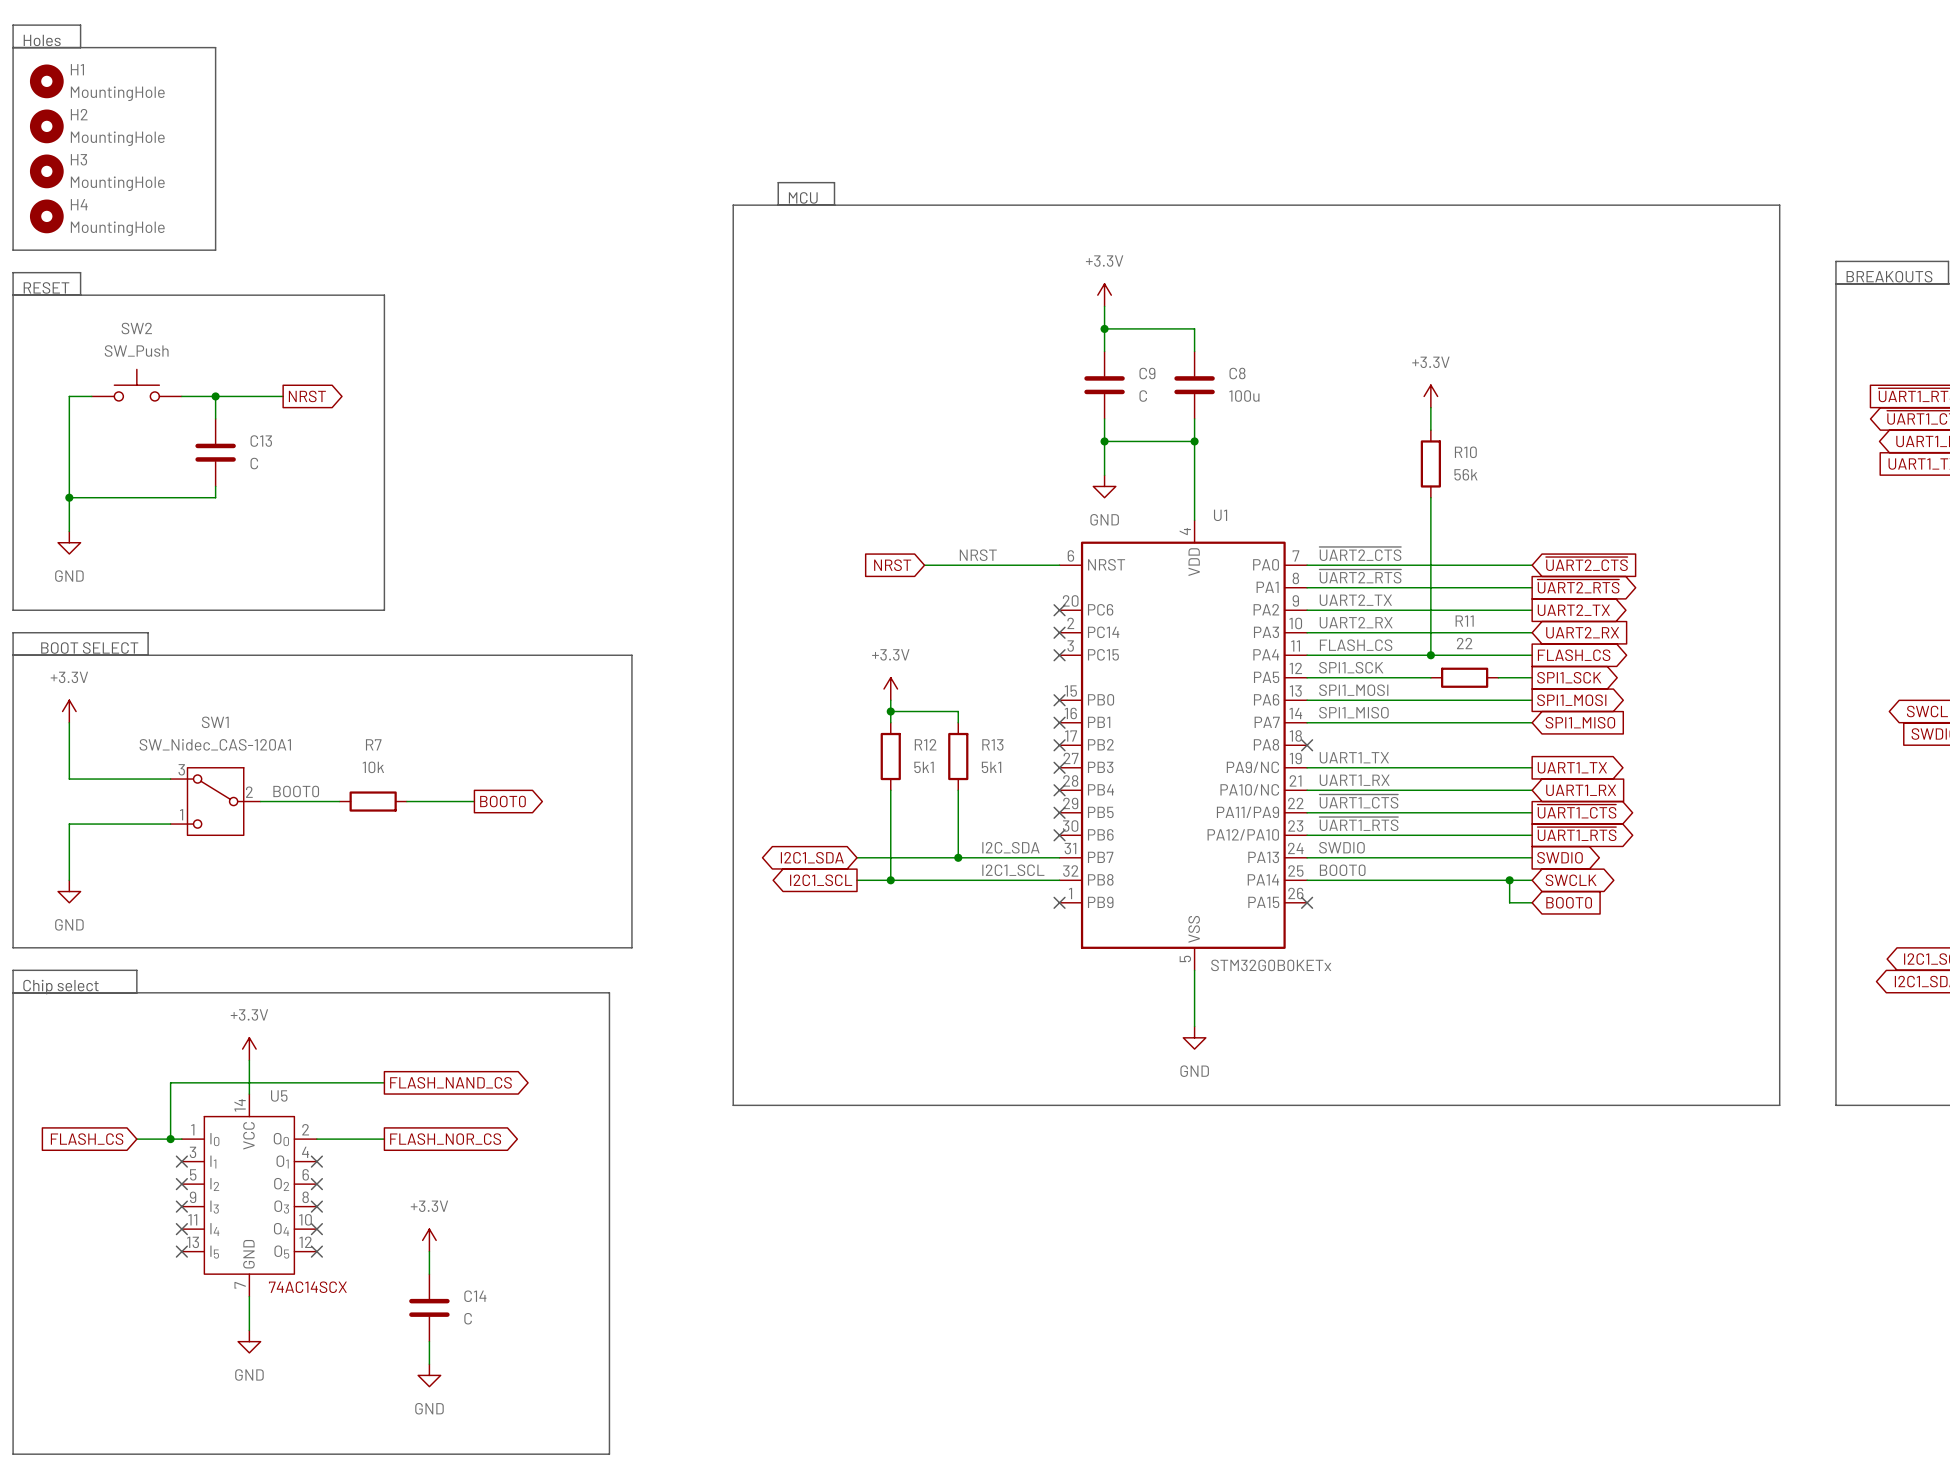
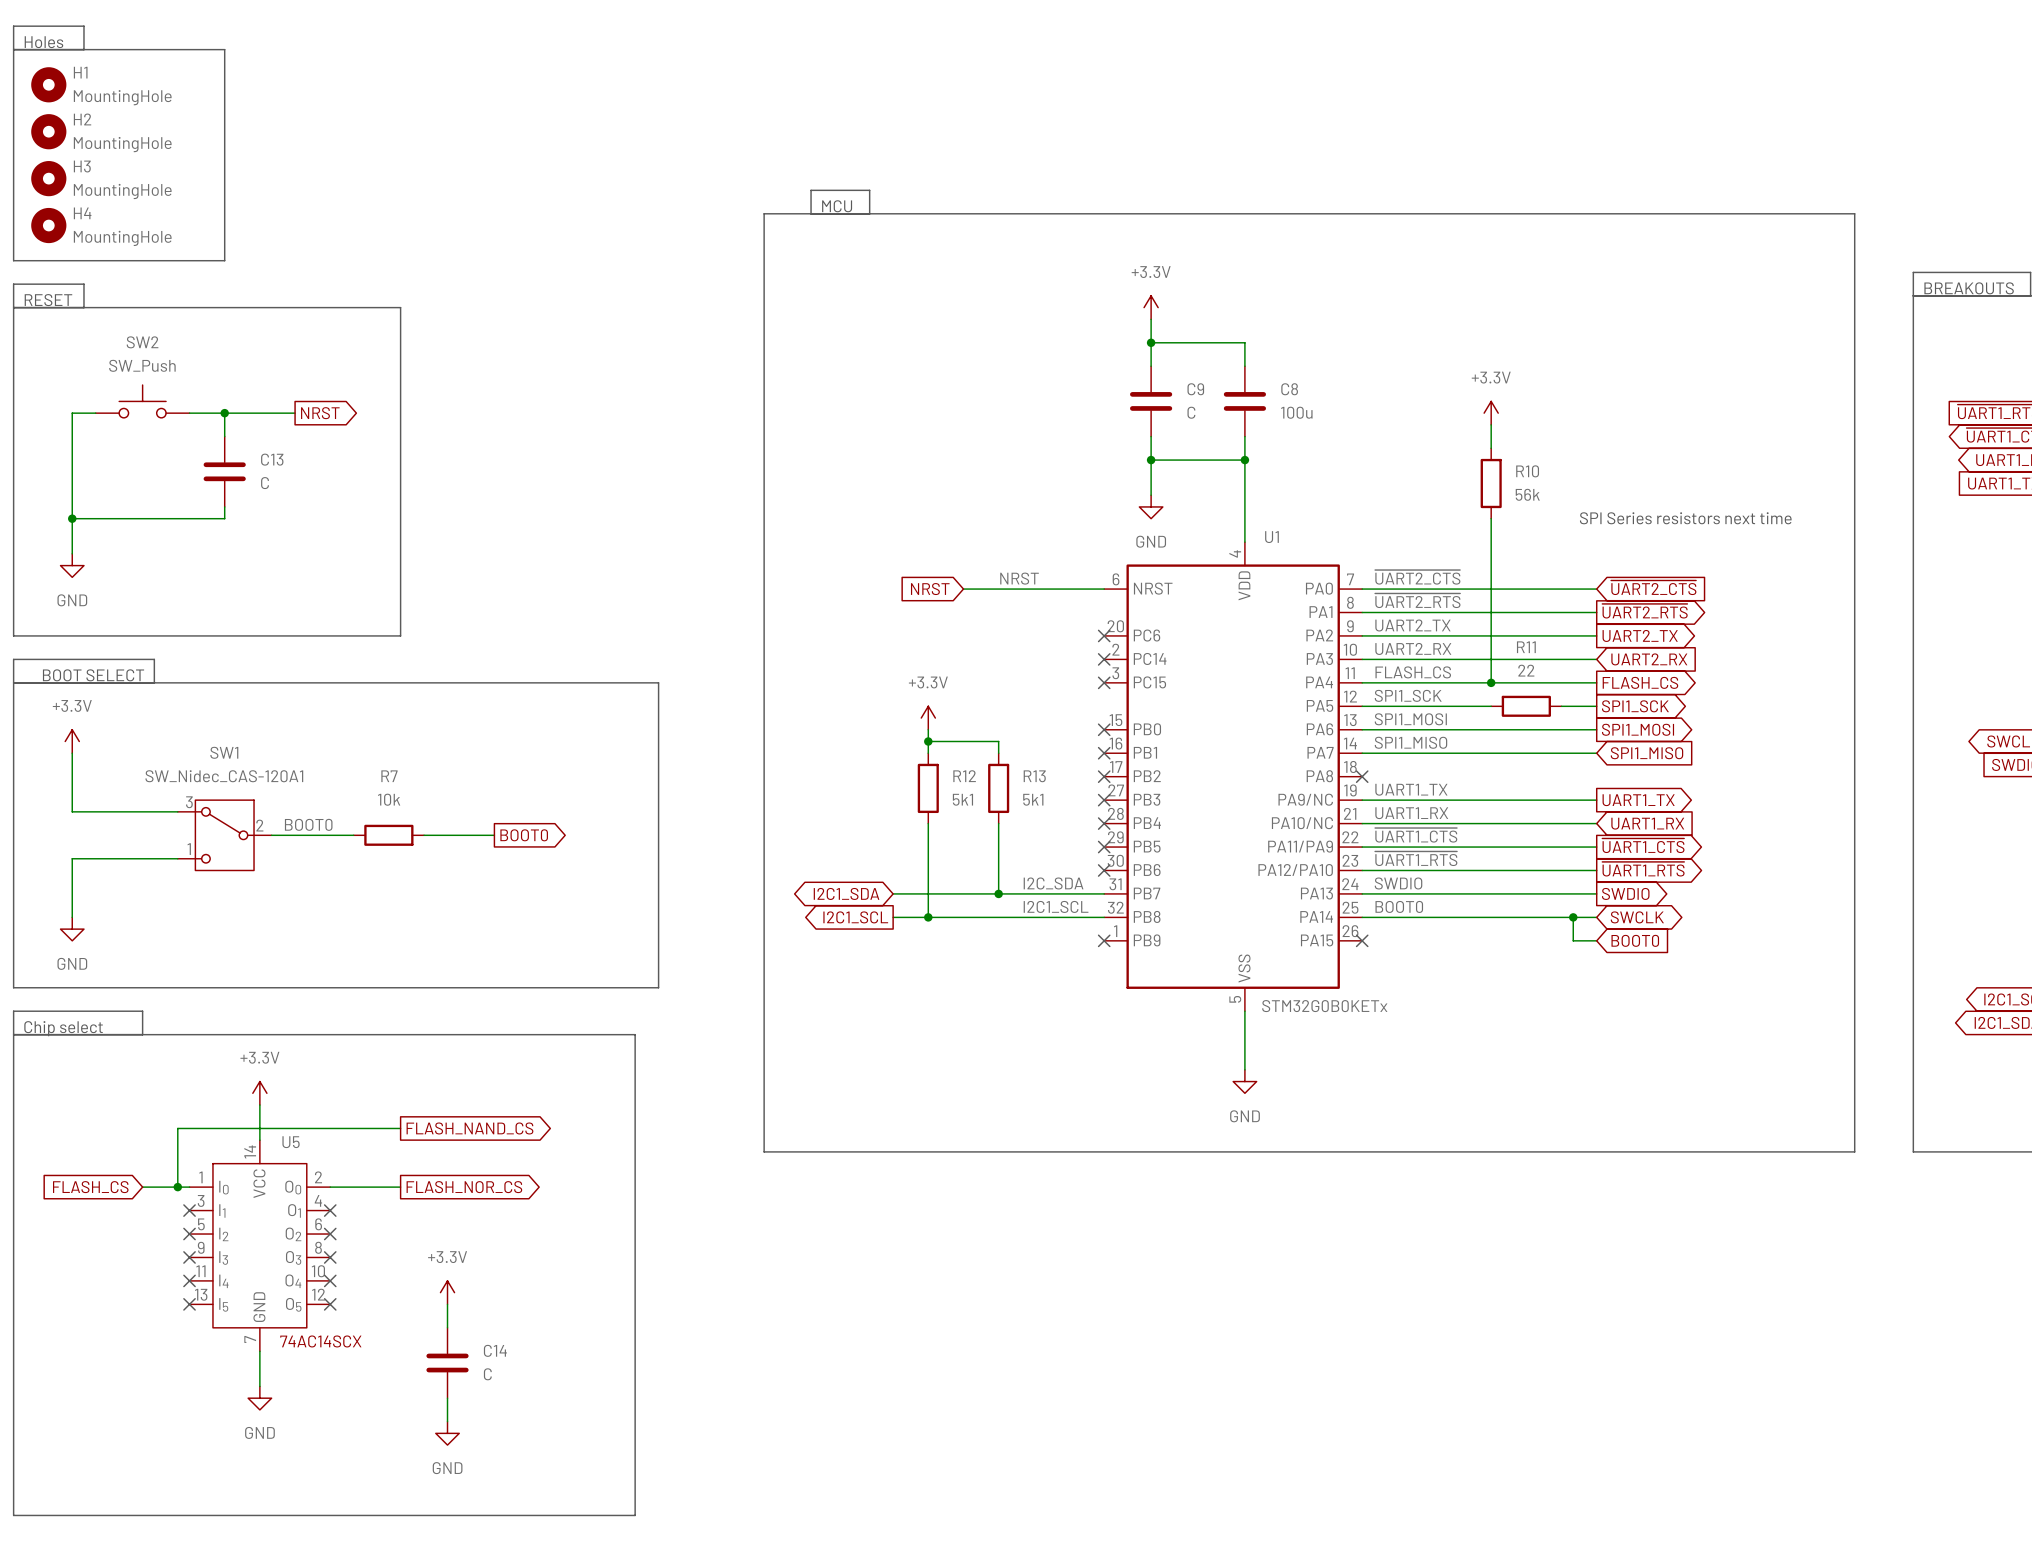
text: none -> SPI Series resistors next time (1685, 518)

